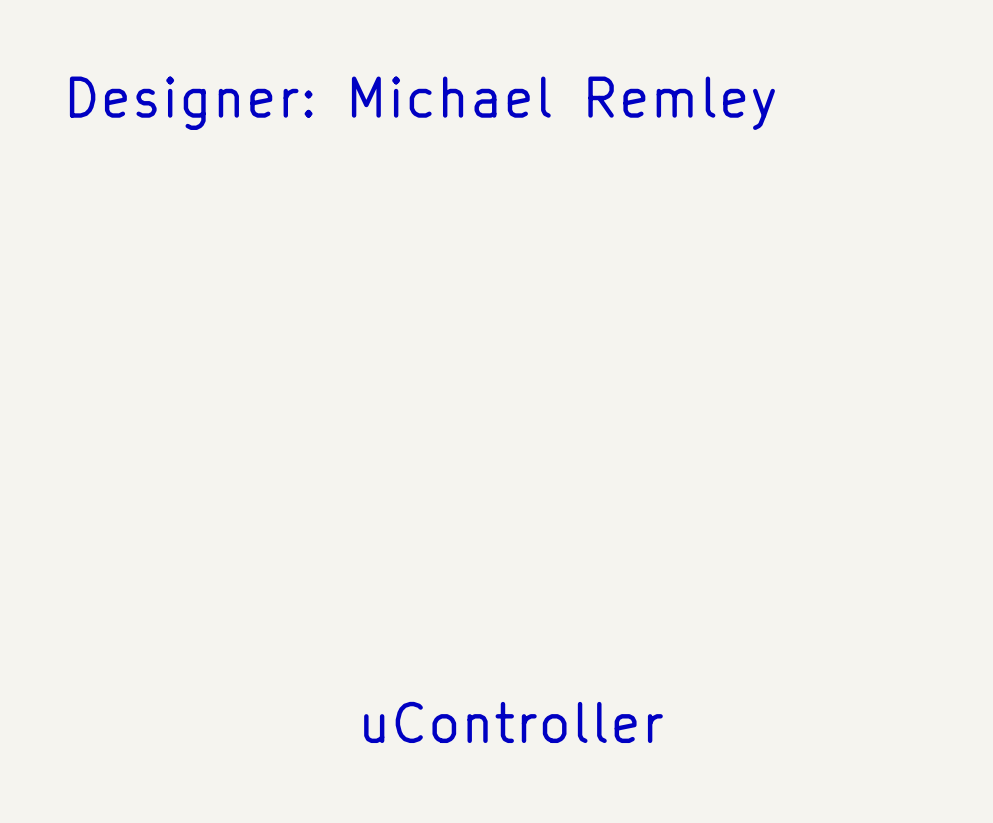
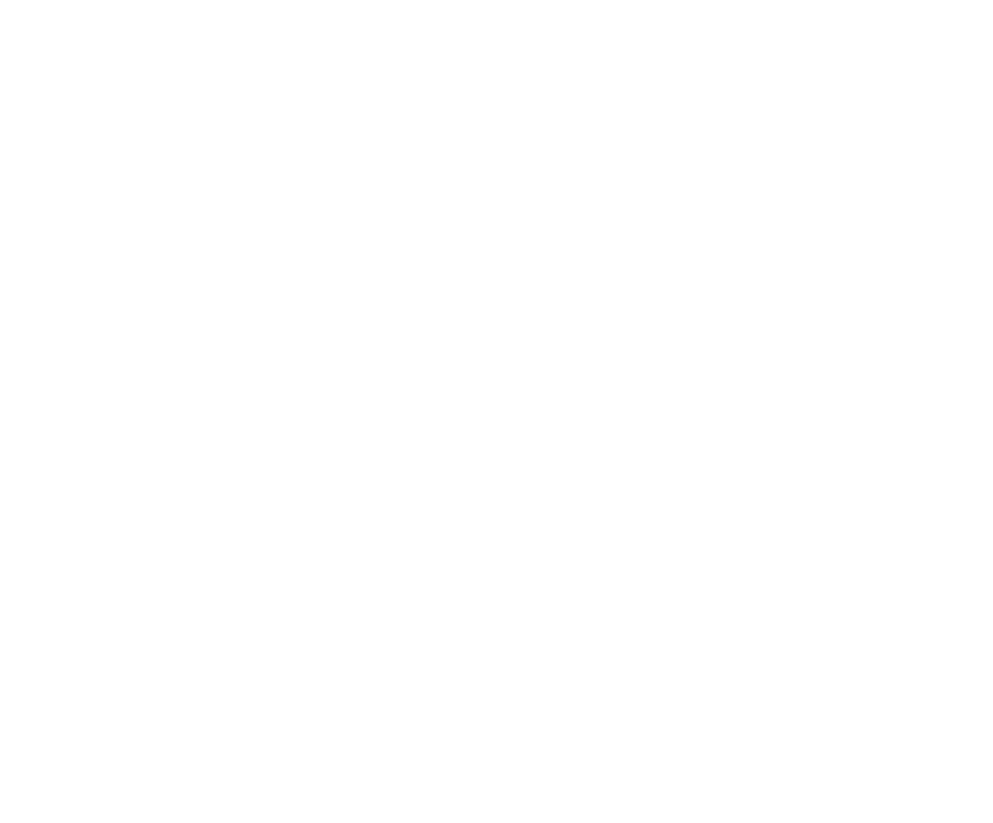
text: Designer: Michael Remley (422, 103) -> none
text: uController (513, 722) -> none

